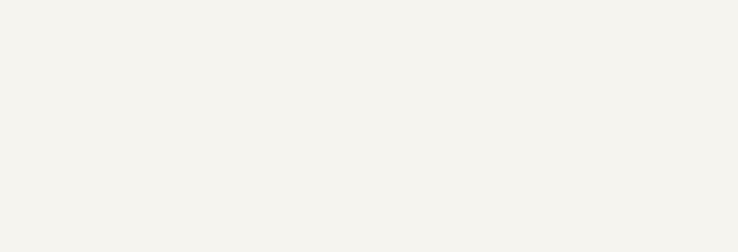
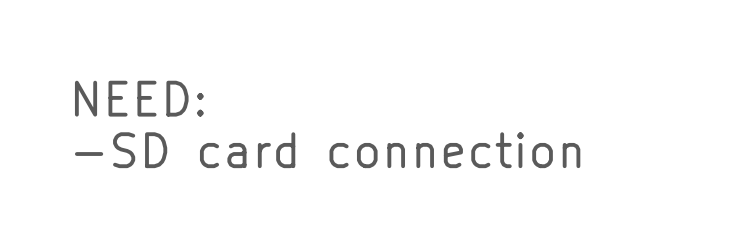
text: none -> NEED: (139, 98)
text: none -> -SD card connection (327, 150)

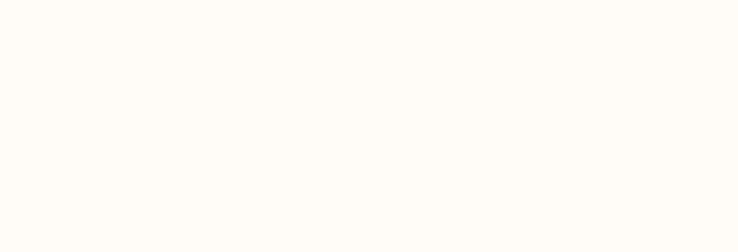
text: NEED: (139, 98) -> none
text: -SD card connection (327, 150) -> none

